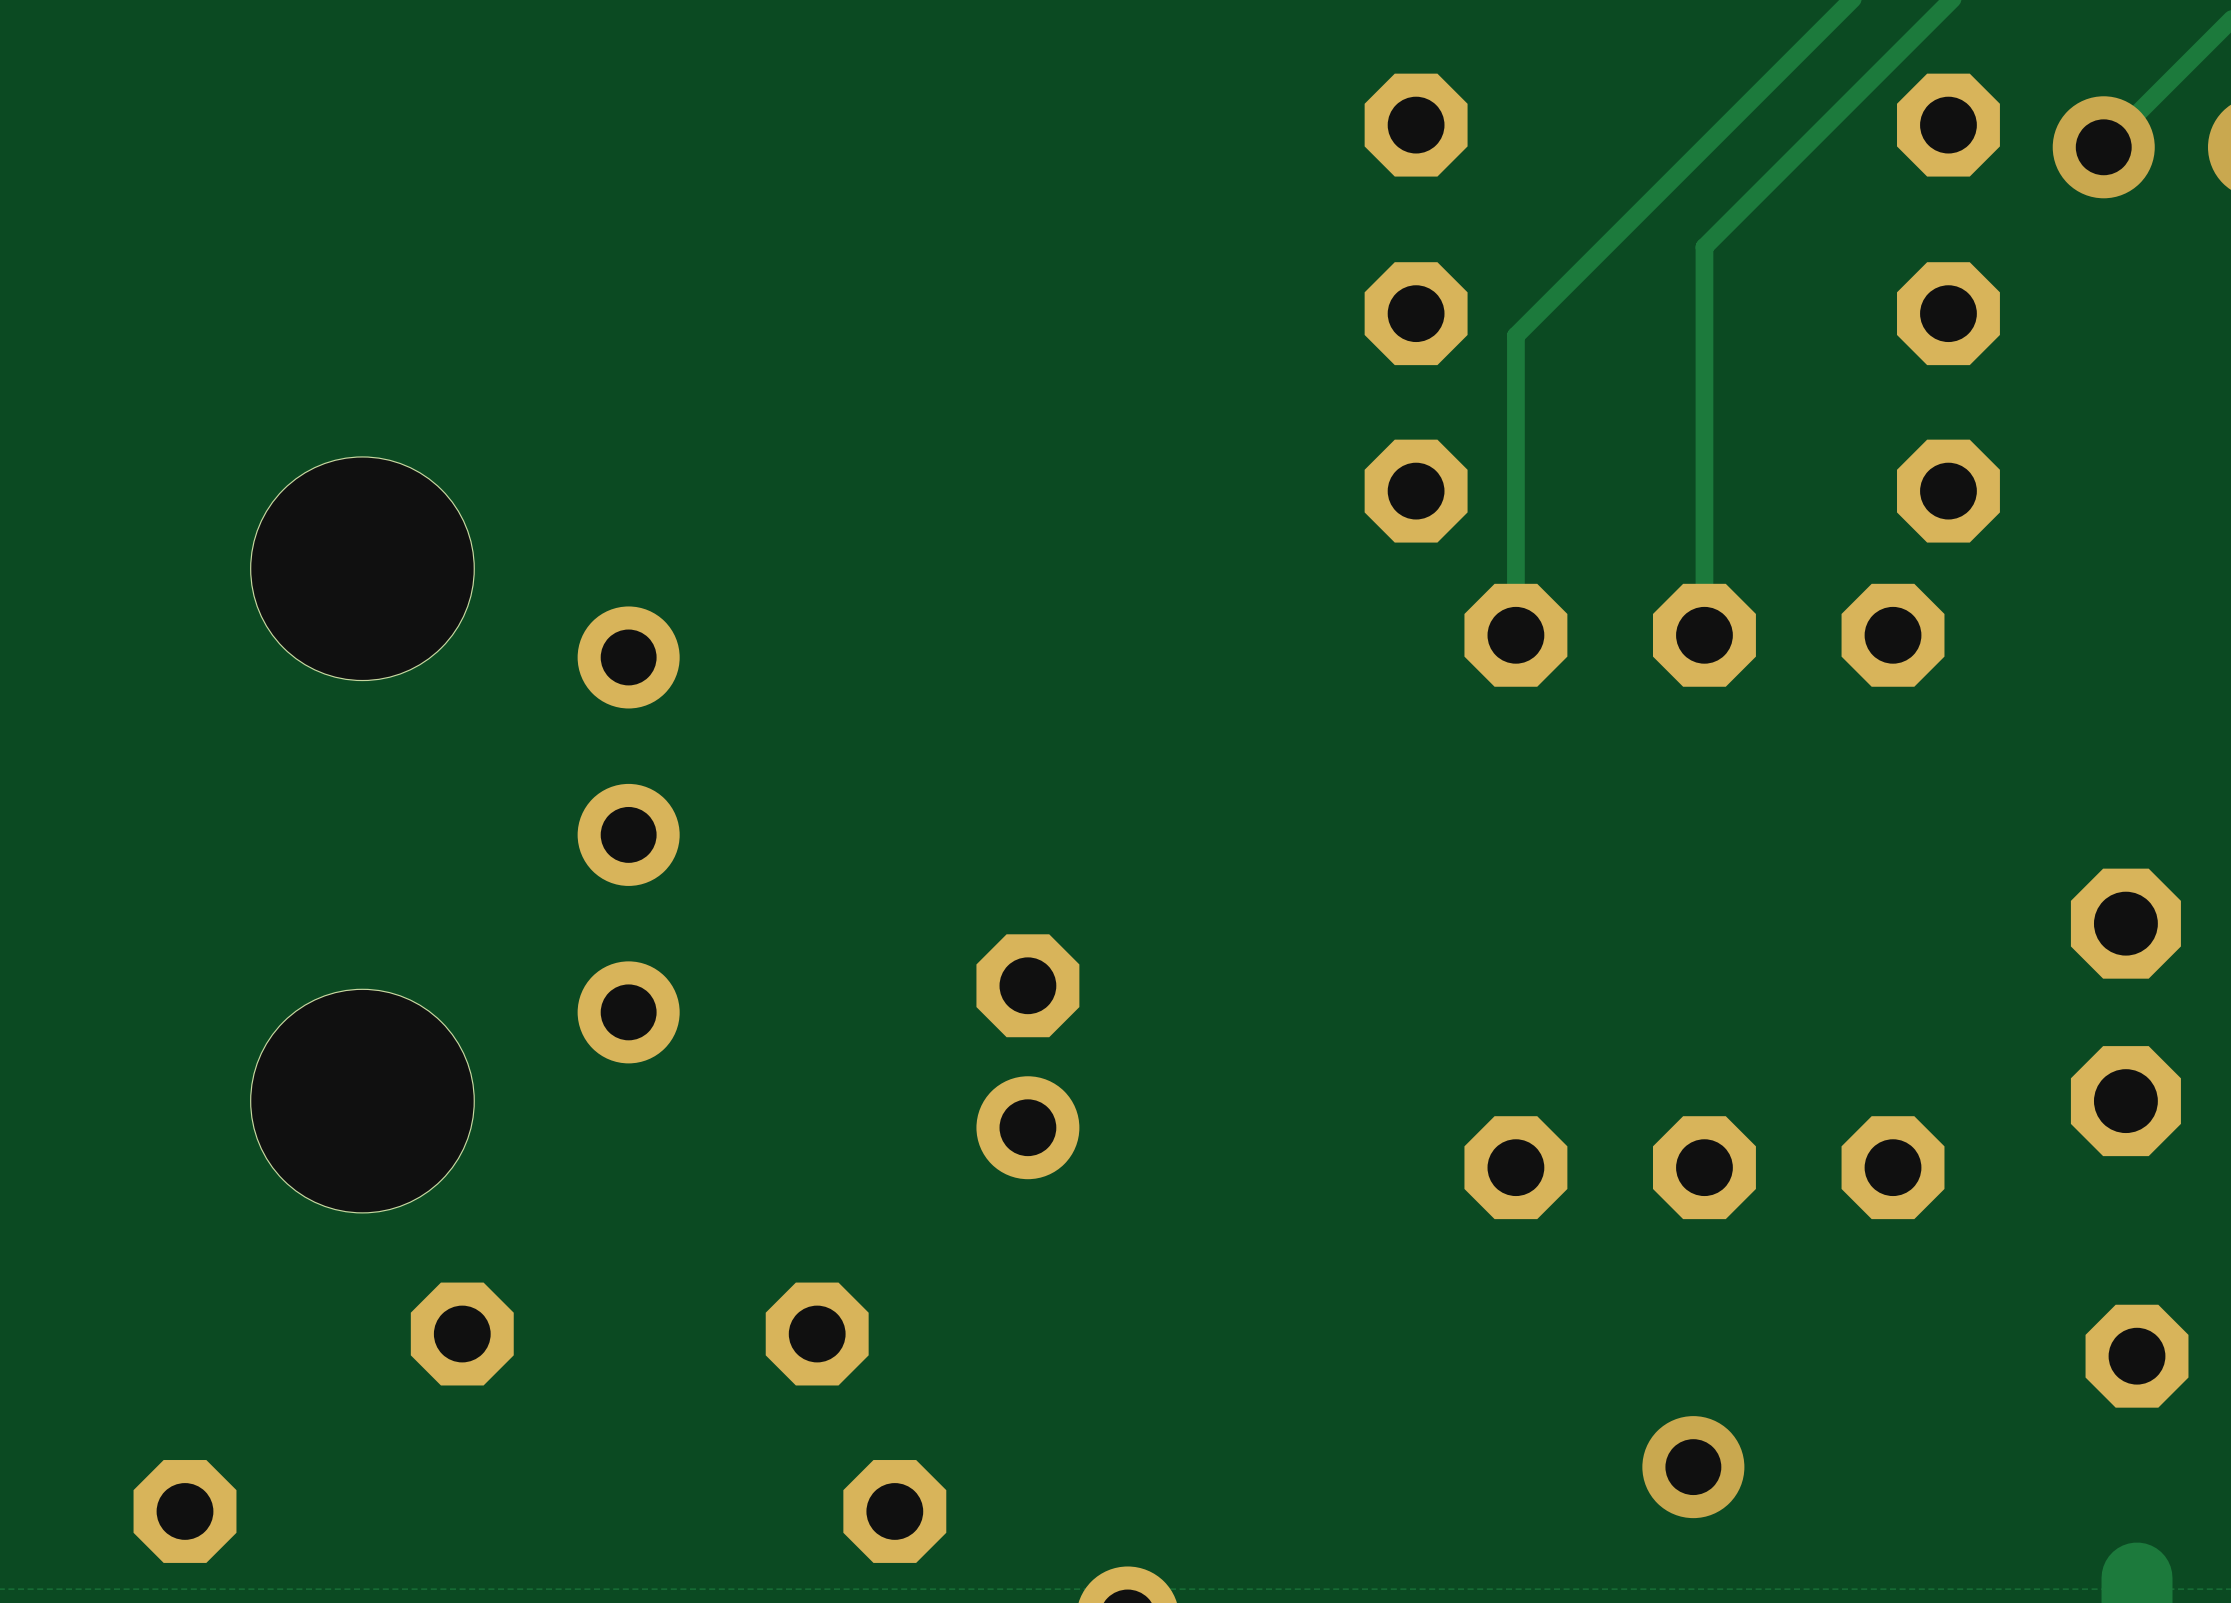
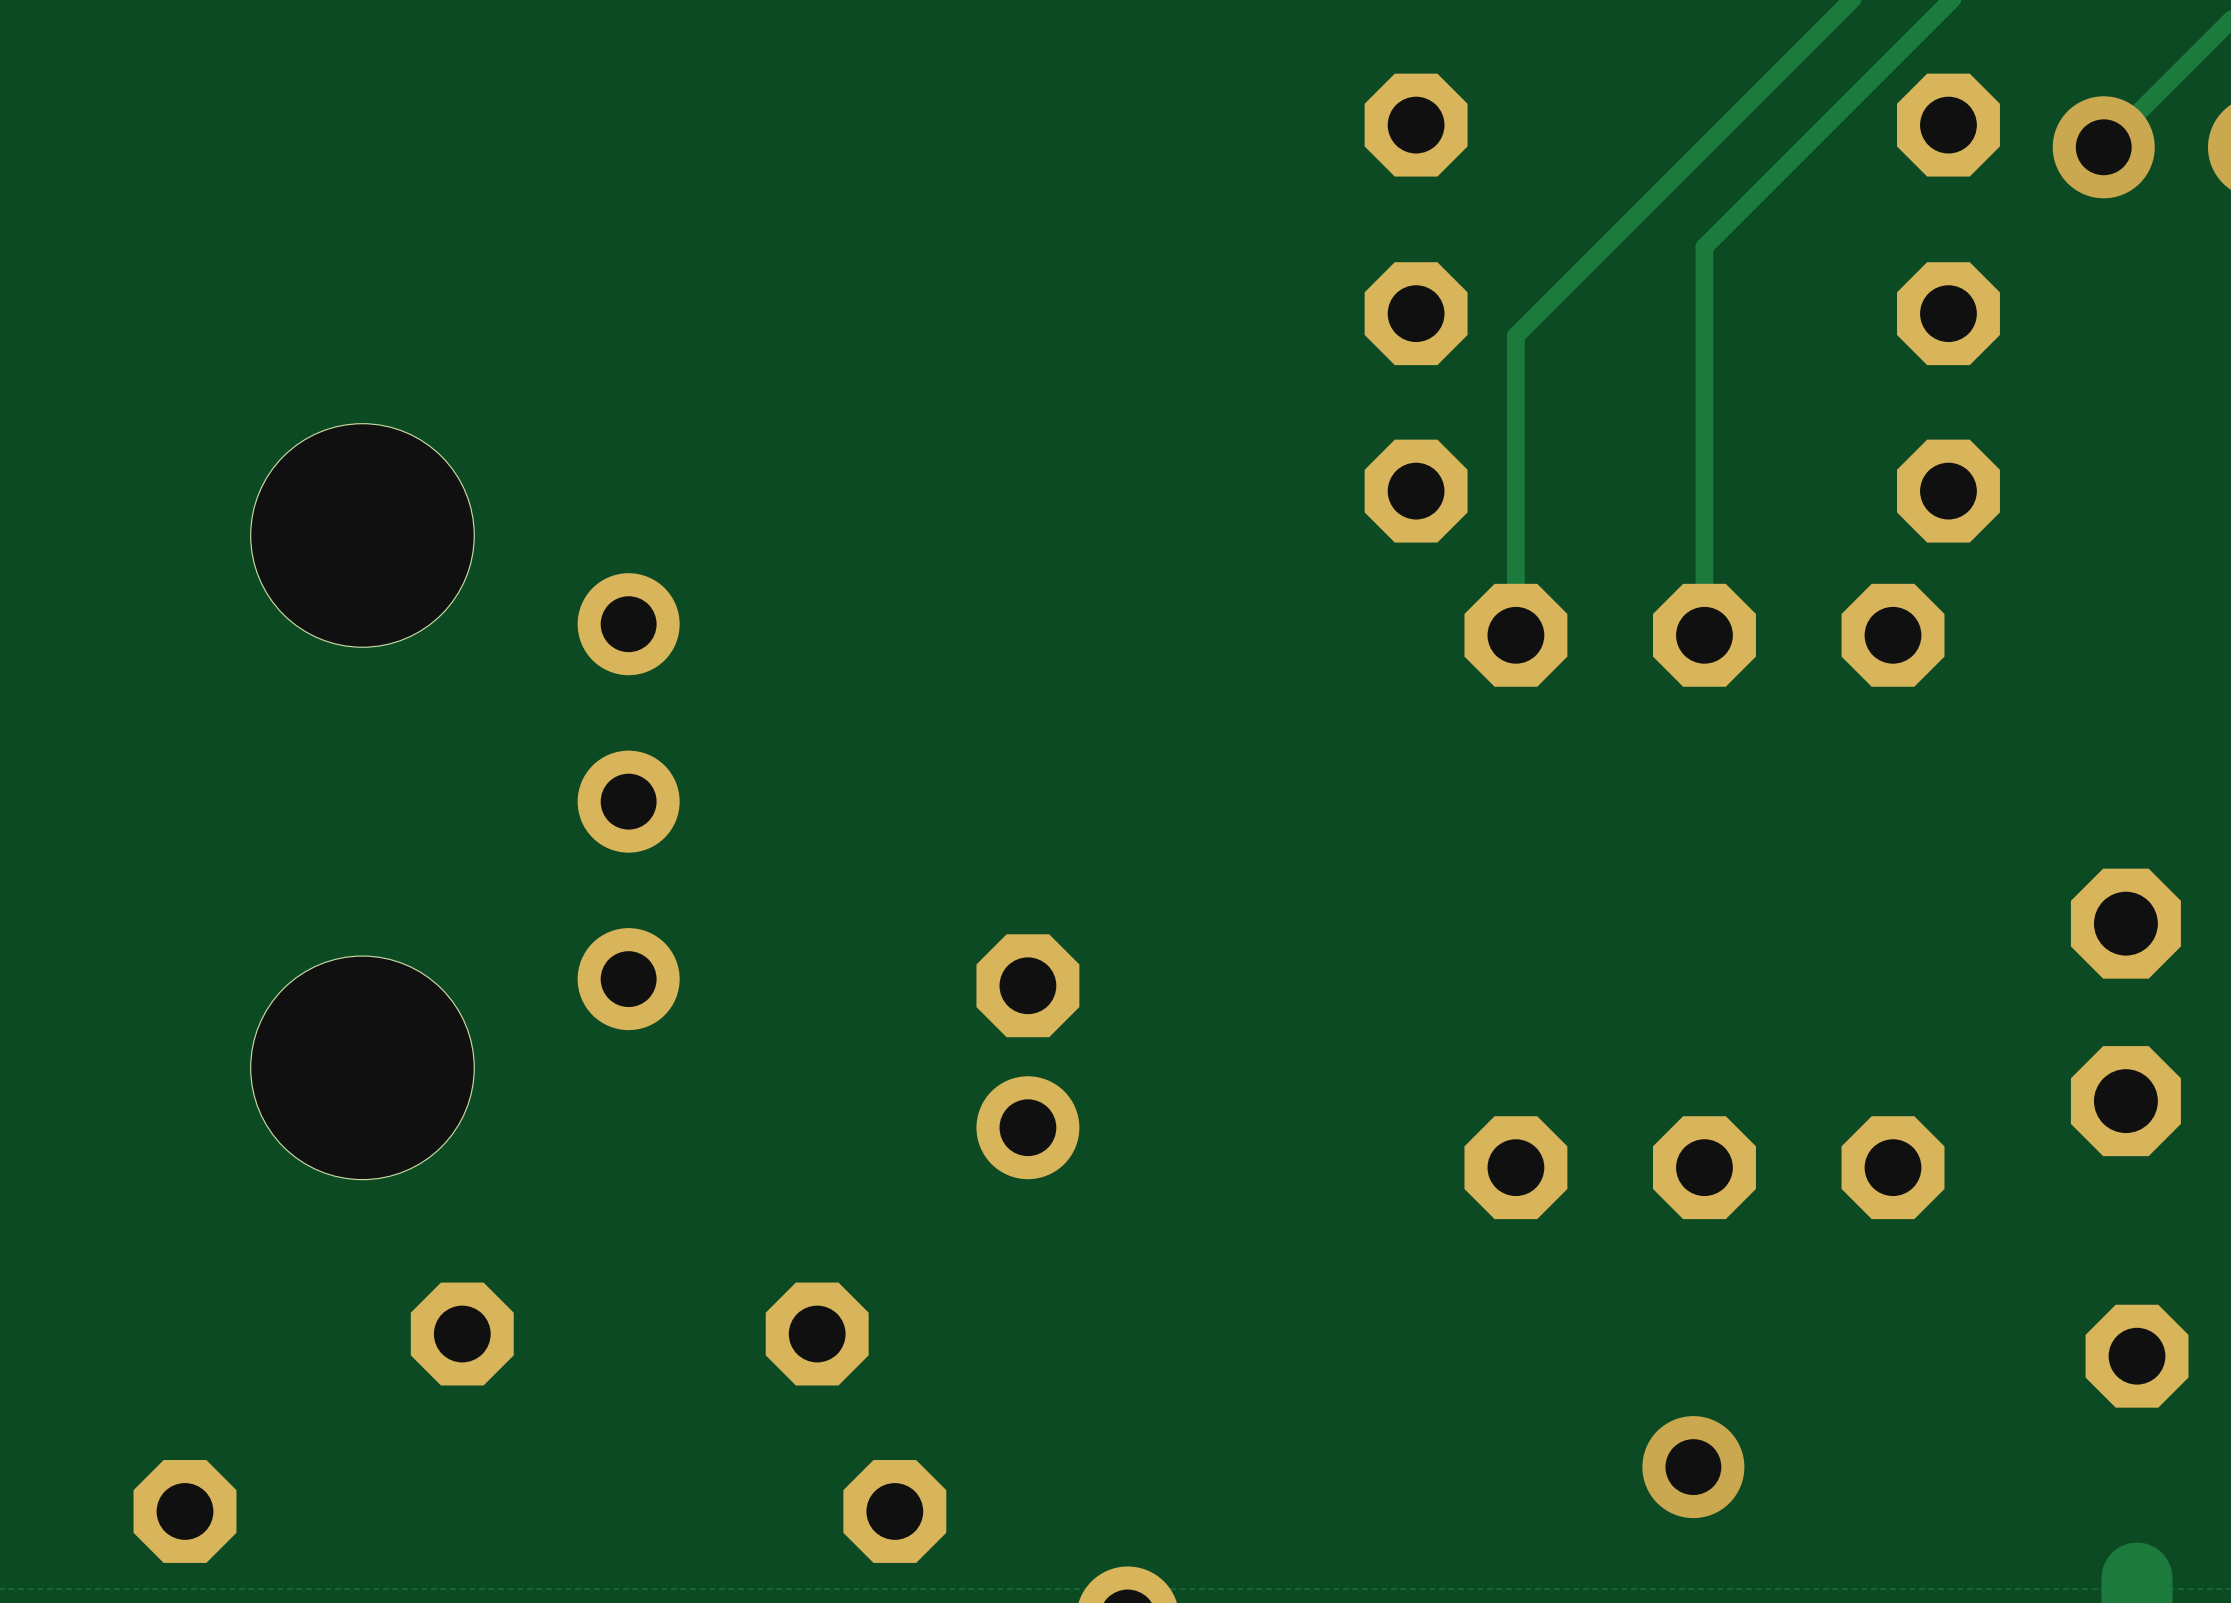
part position: (465, 834) -> (465, 801)

